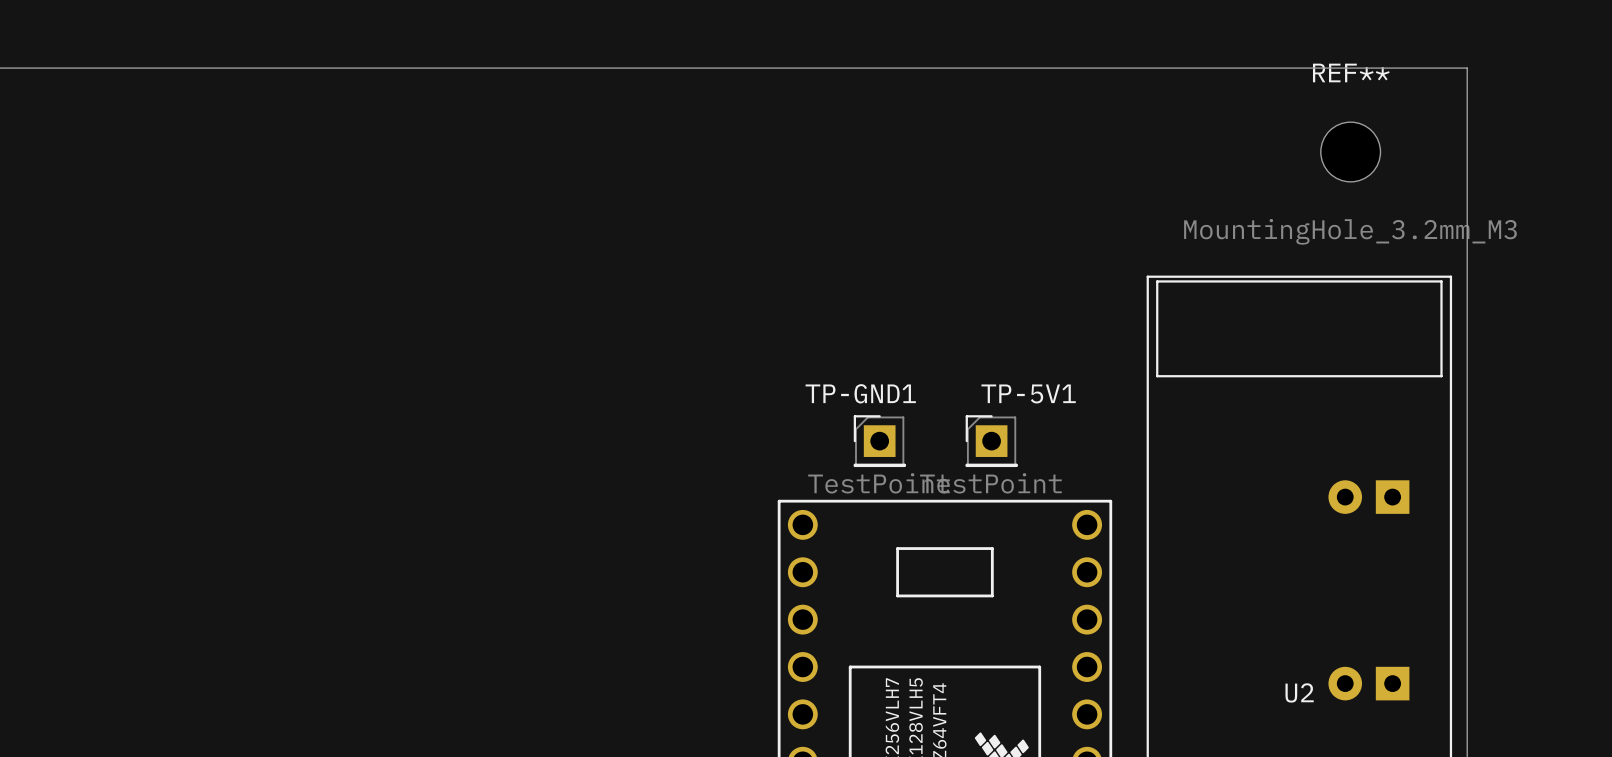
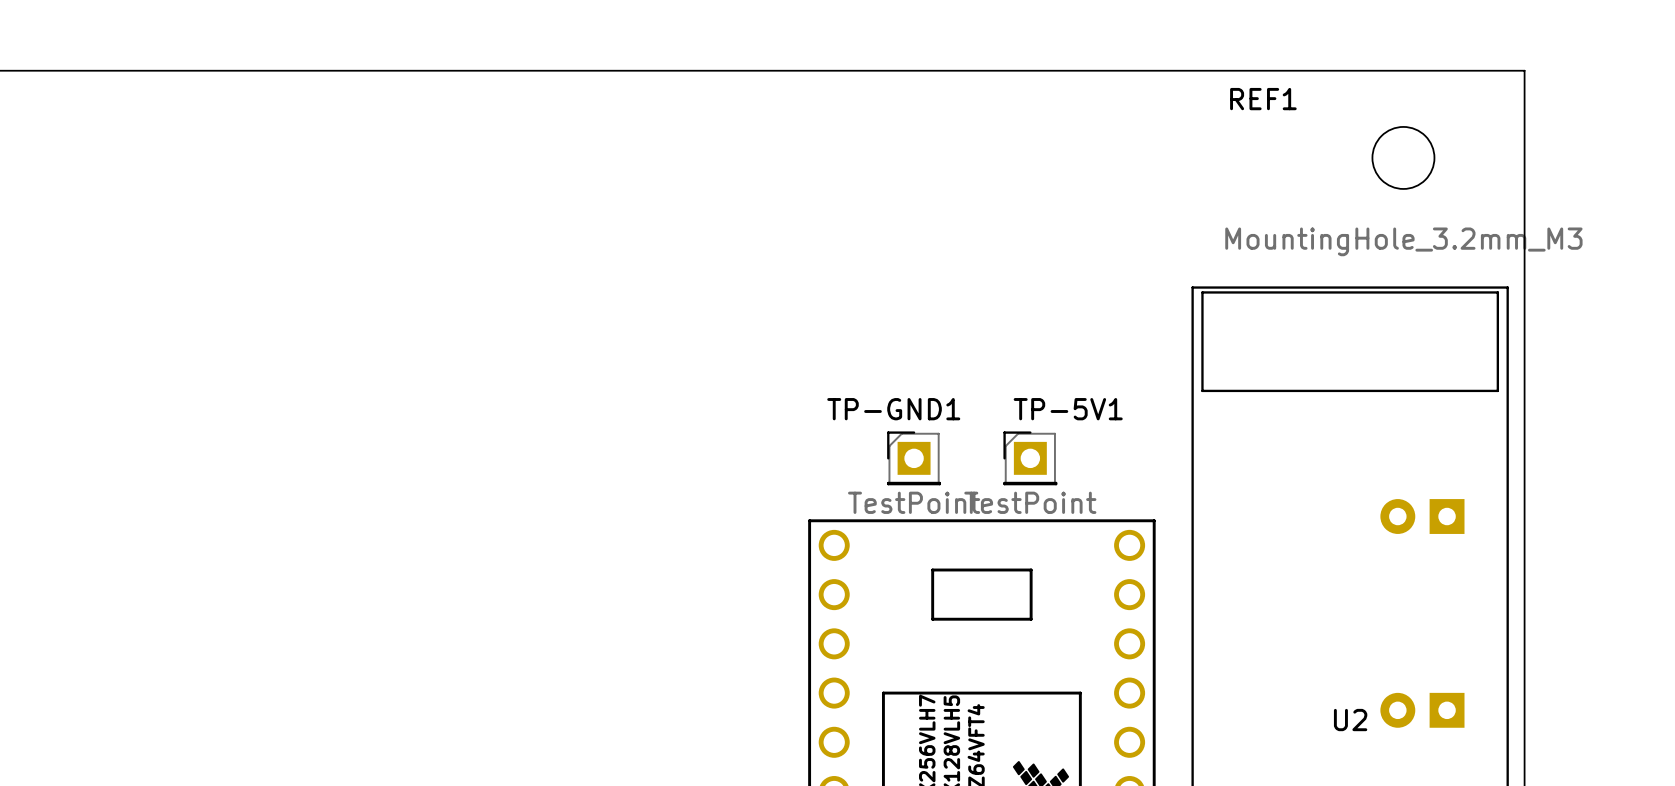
REF** name: REF** (1351, 72) -> REF1 (1263, 99)

